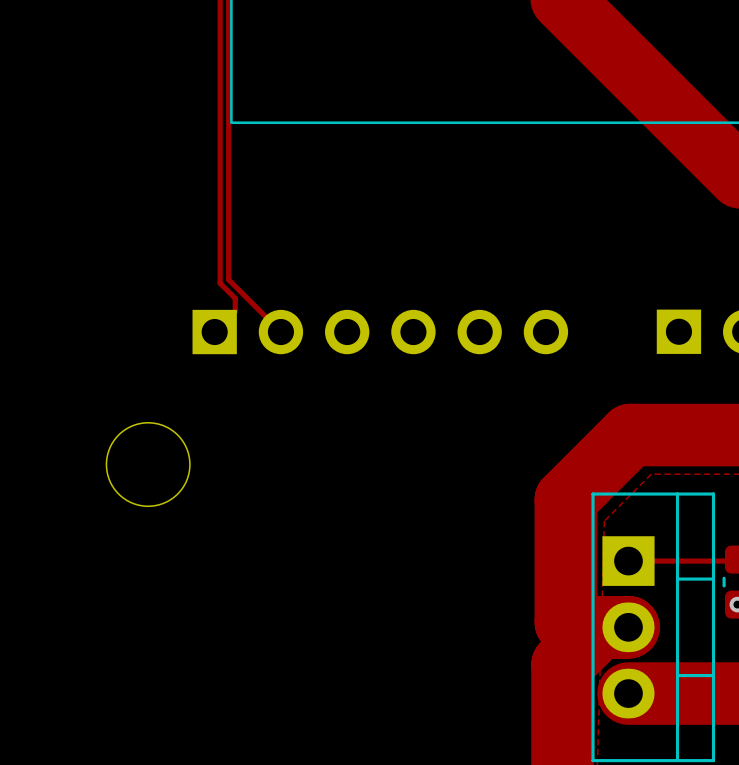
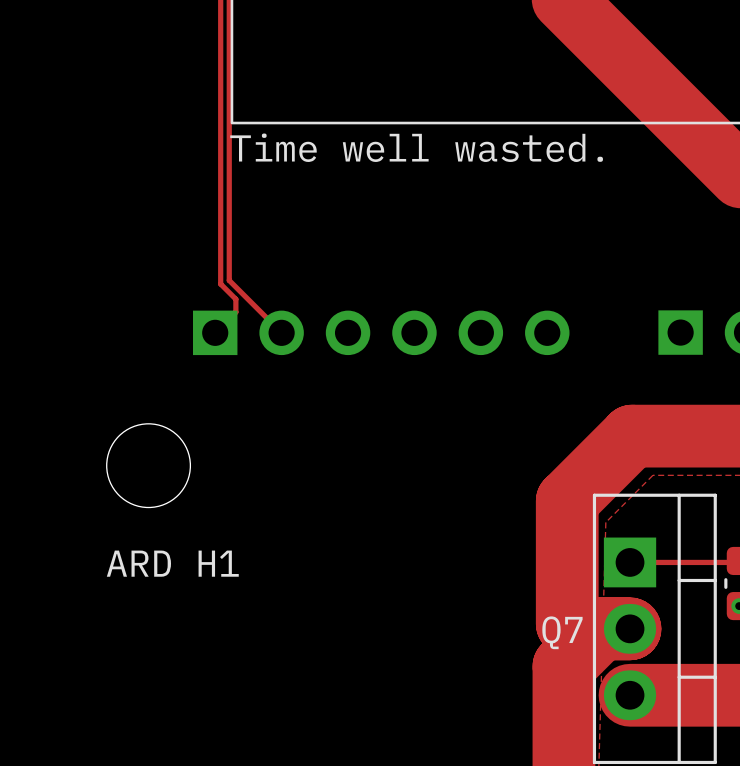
text: none -> Time well wasted. (416, 147)
text: none -> ARD H1 (172, 563)
Q7 name: none -> Q7 (562, 632)

